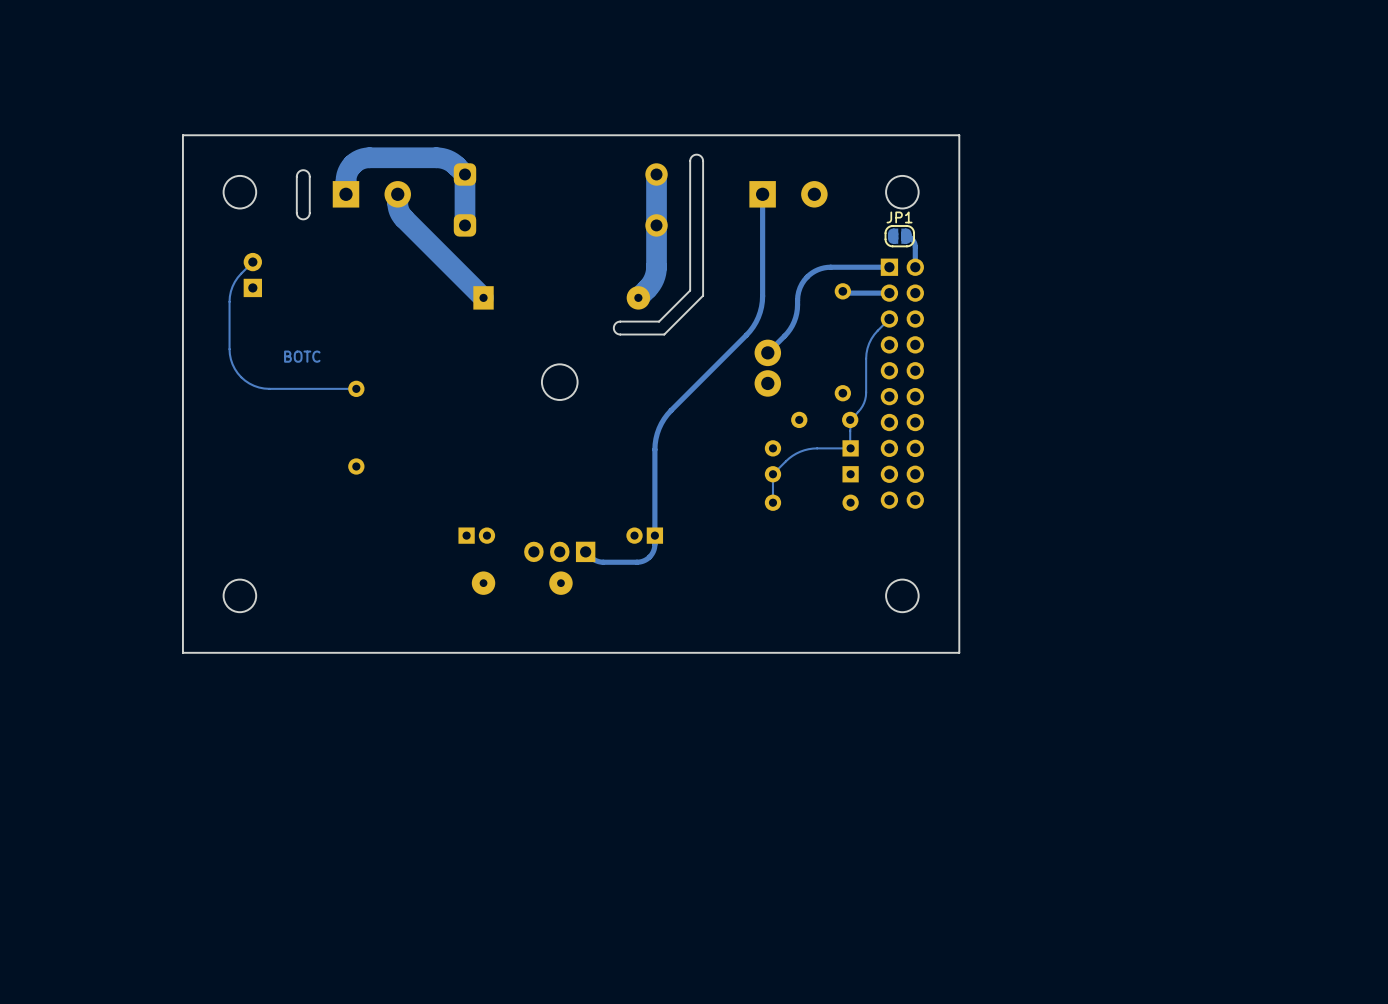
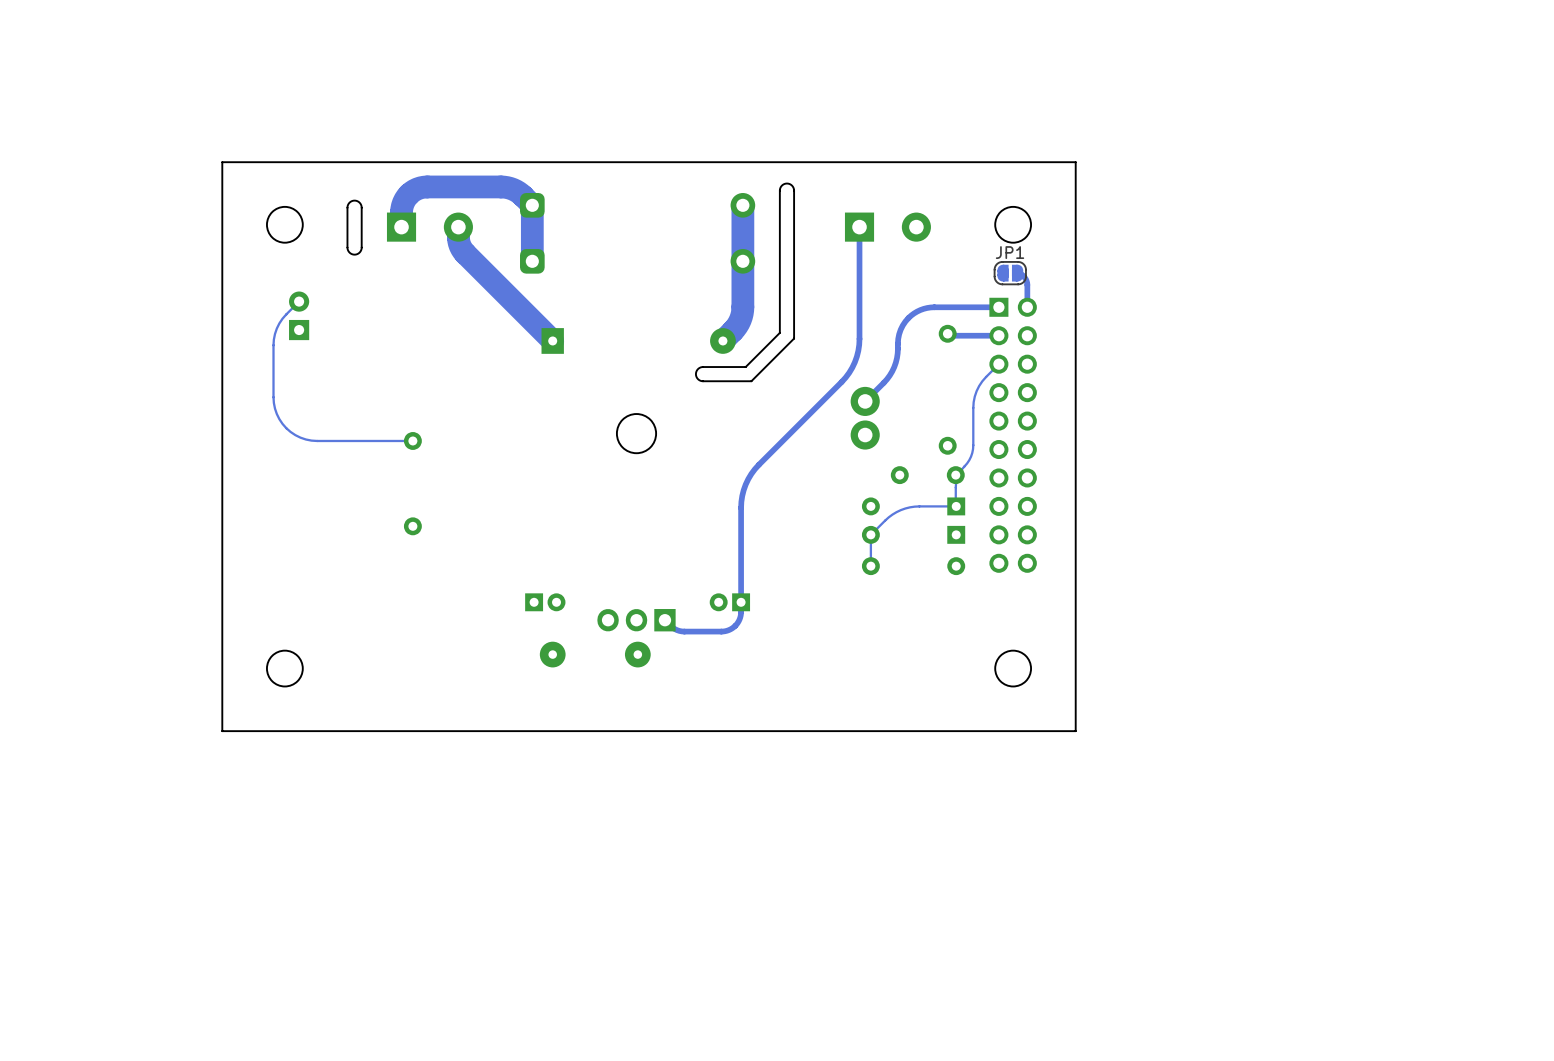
text: BOTC (302, 356) -> none

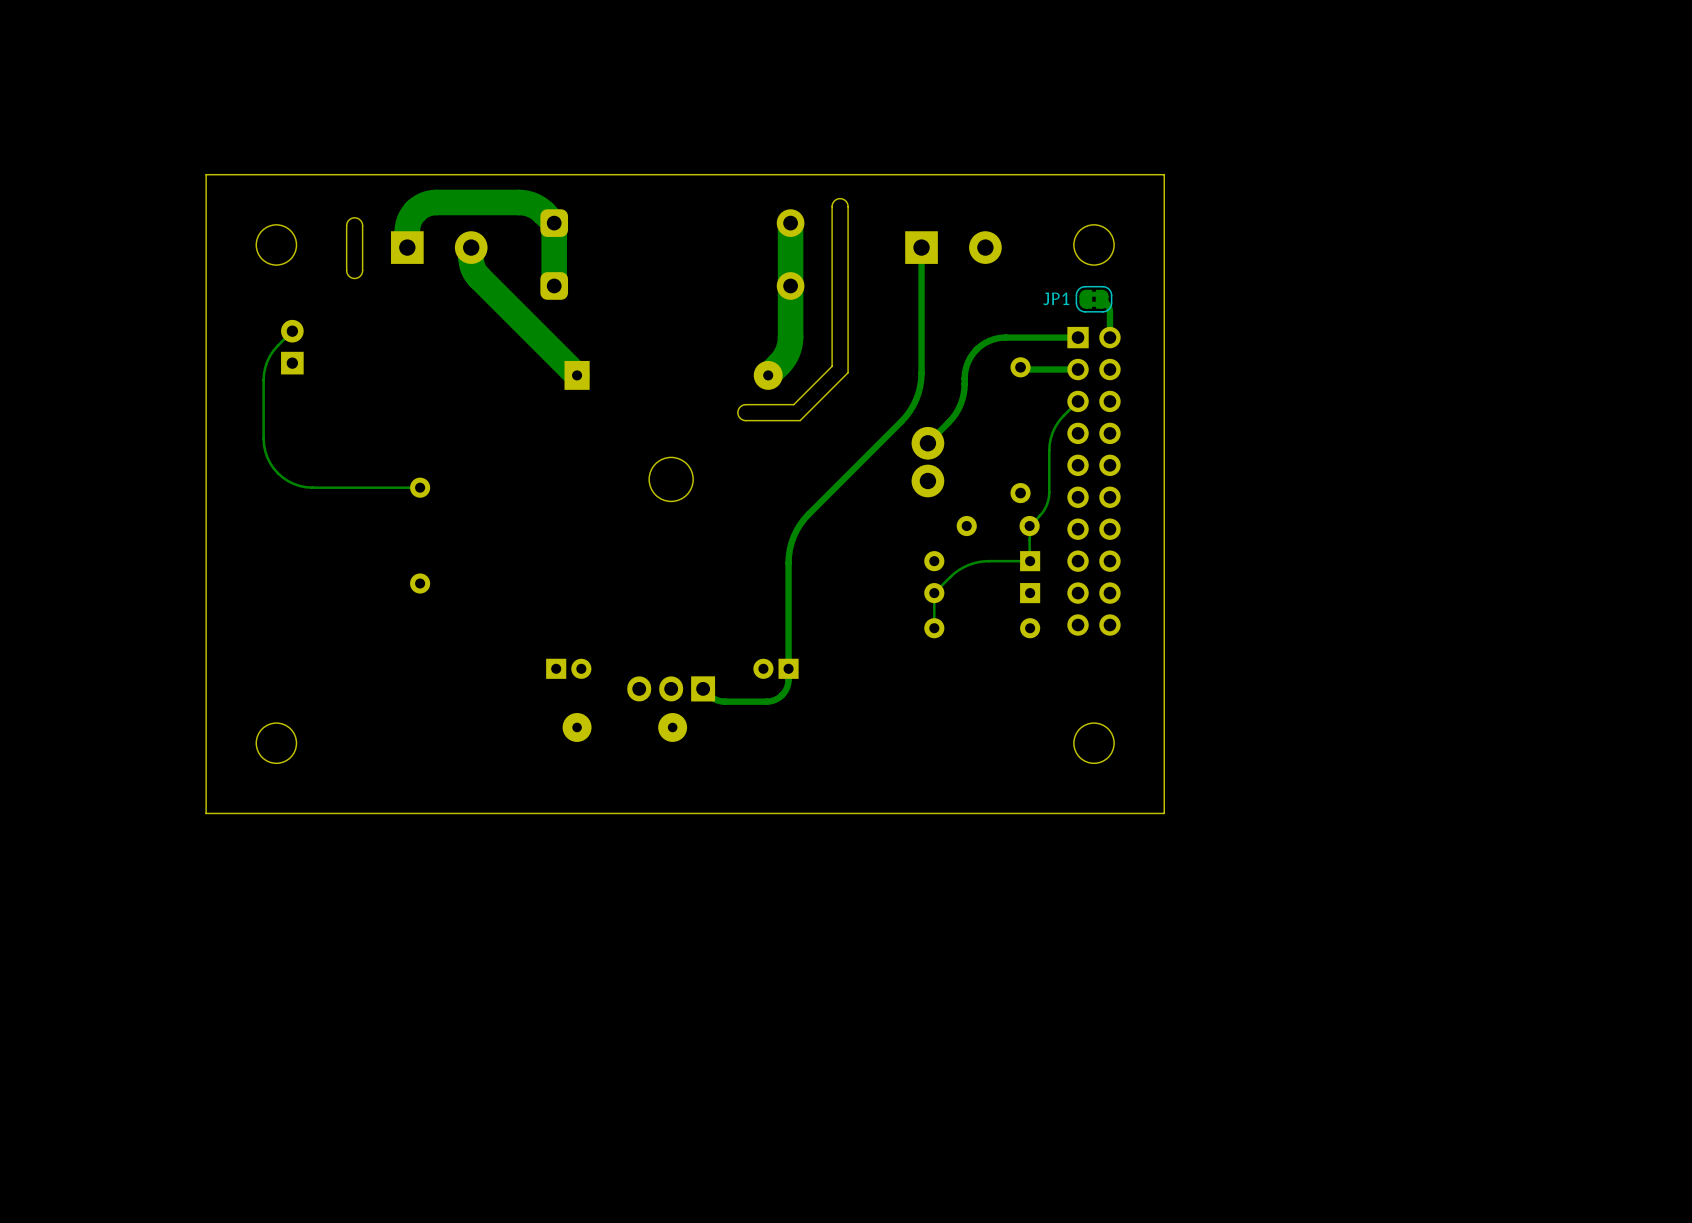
JP1 name position: JP1 (1010, 252) -> JP1 (1056, 298)
JP1 footprint: [993, 261, 1027, 286] -> [1075, 285, 1113, 313]

